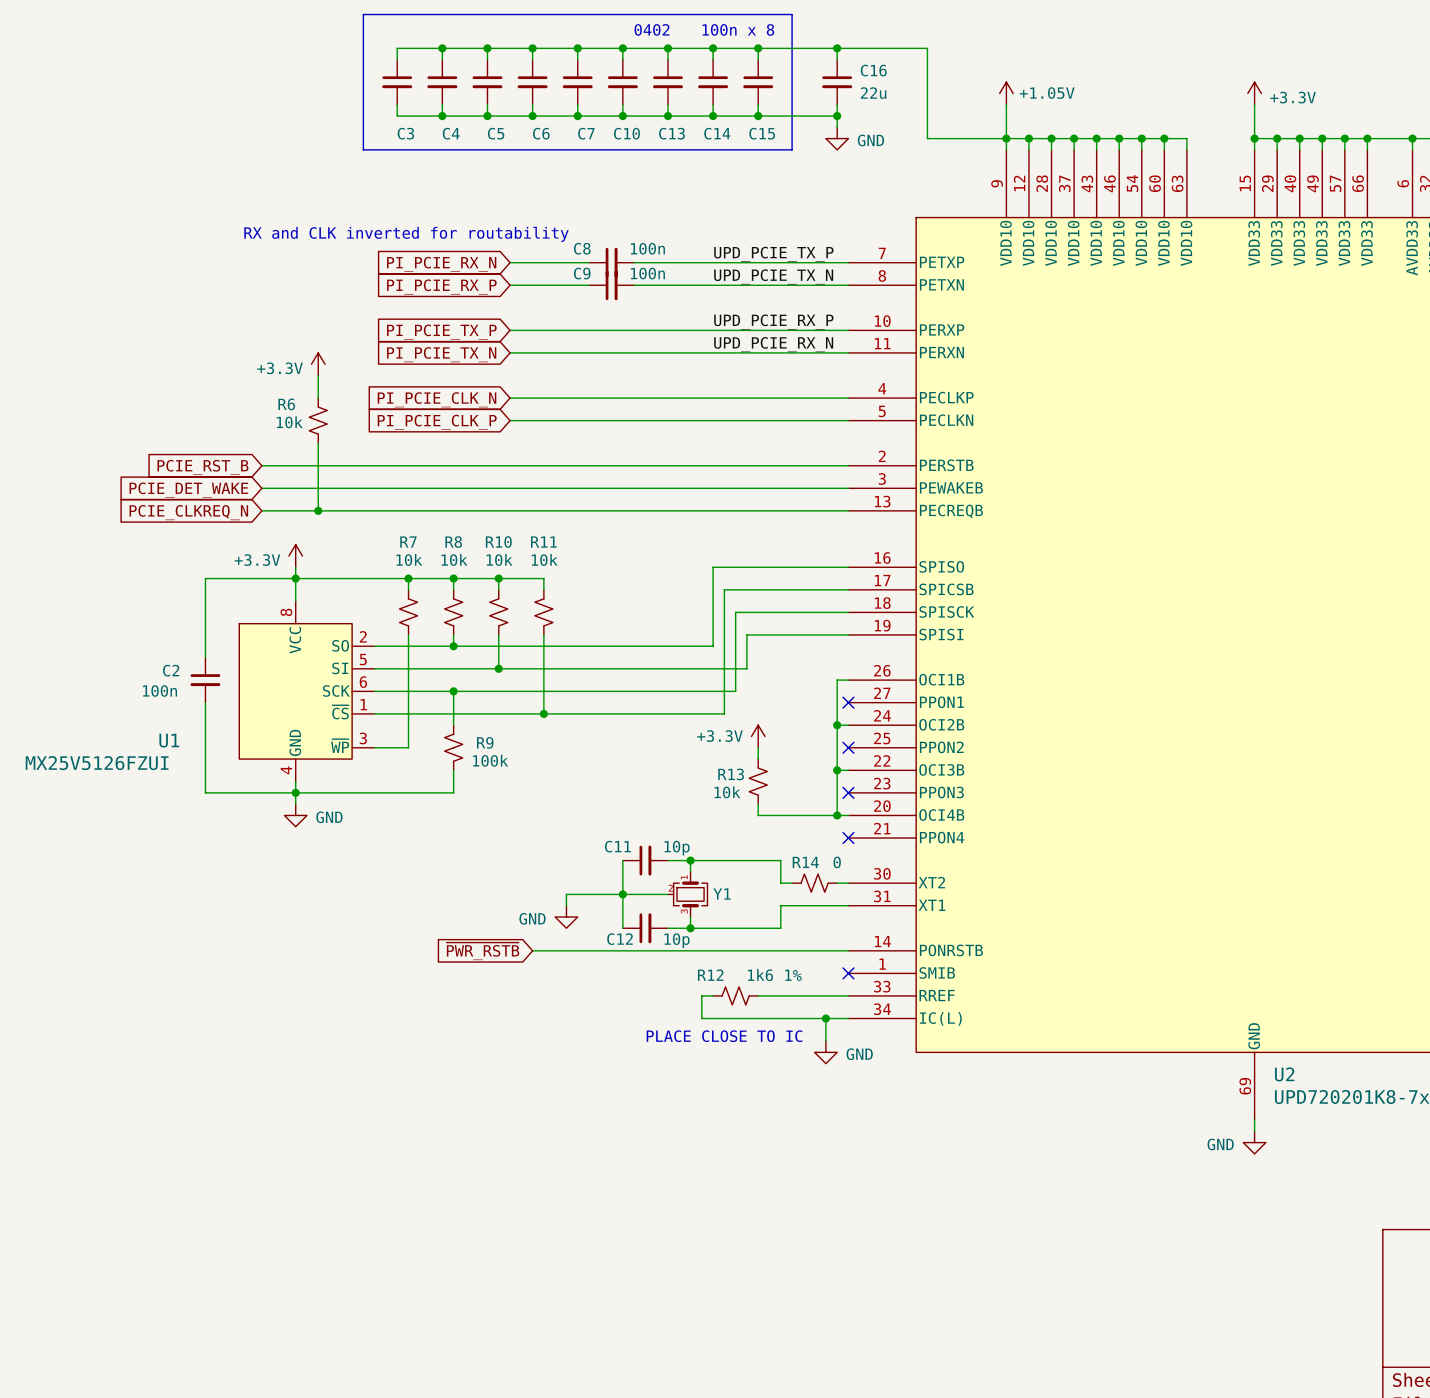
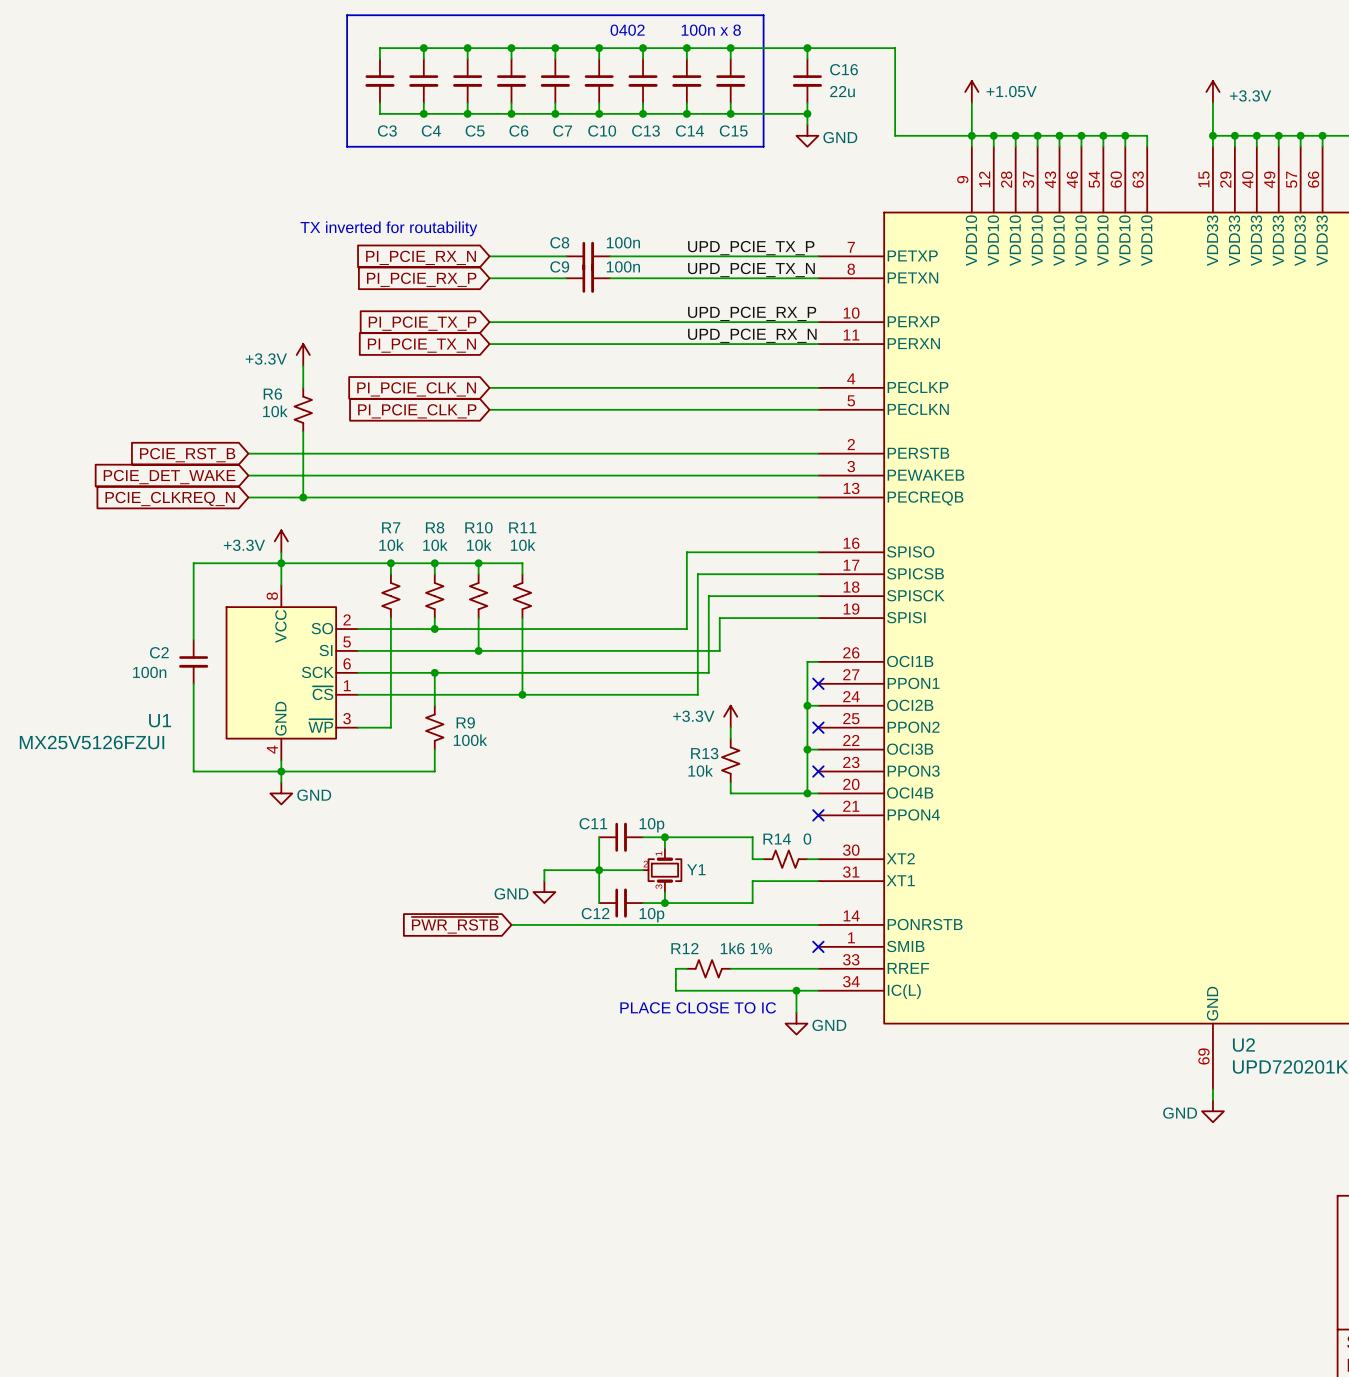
text: RX and CLK inverted for routability (406, 234) -> TX inverted for routability (388, 228)

